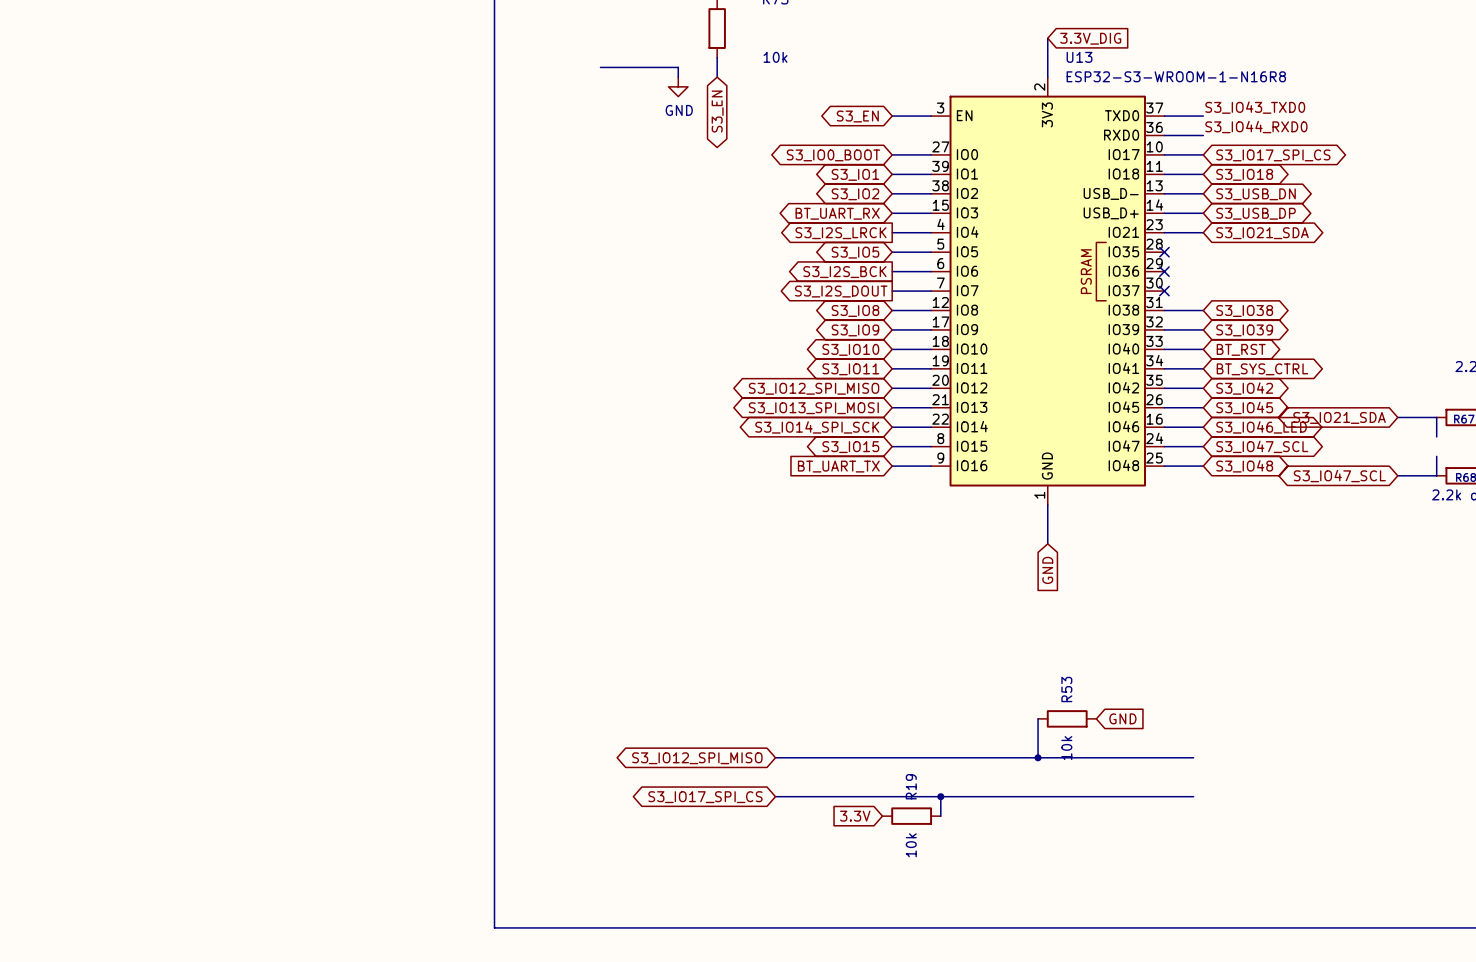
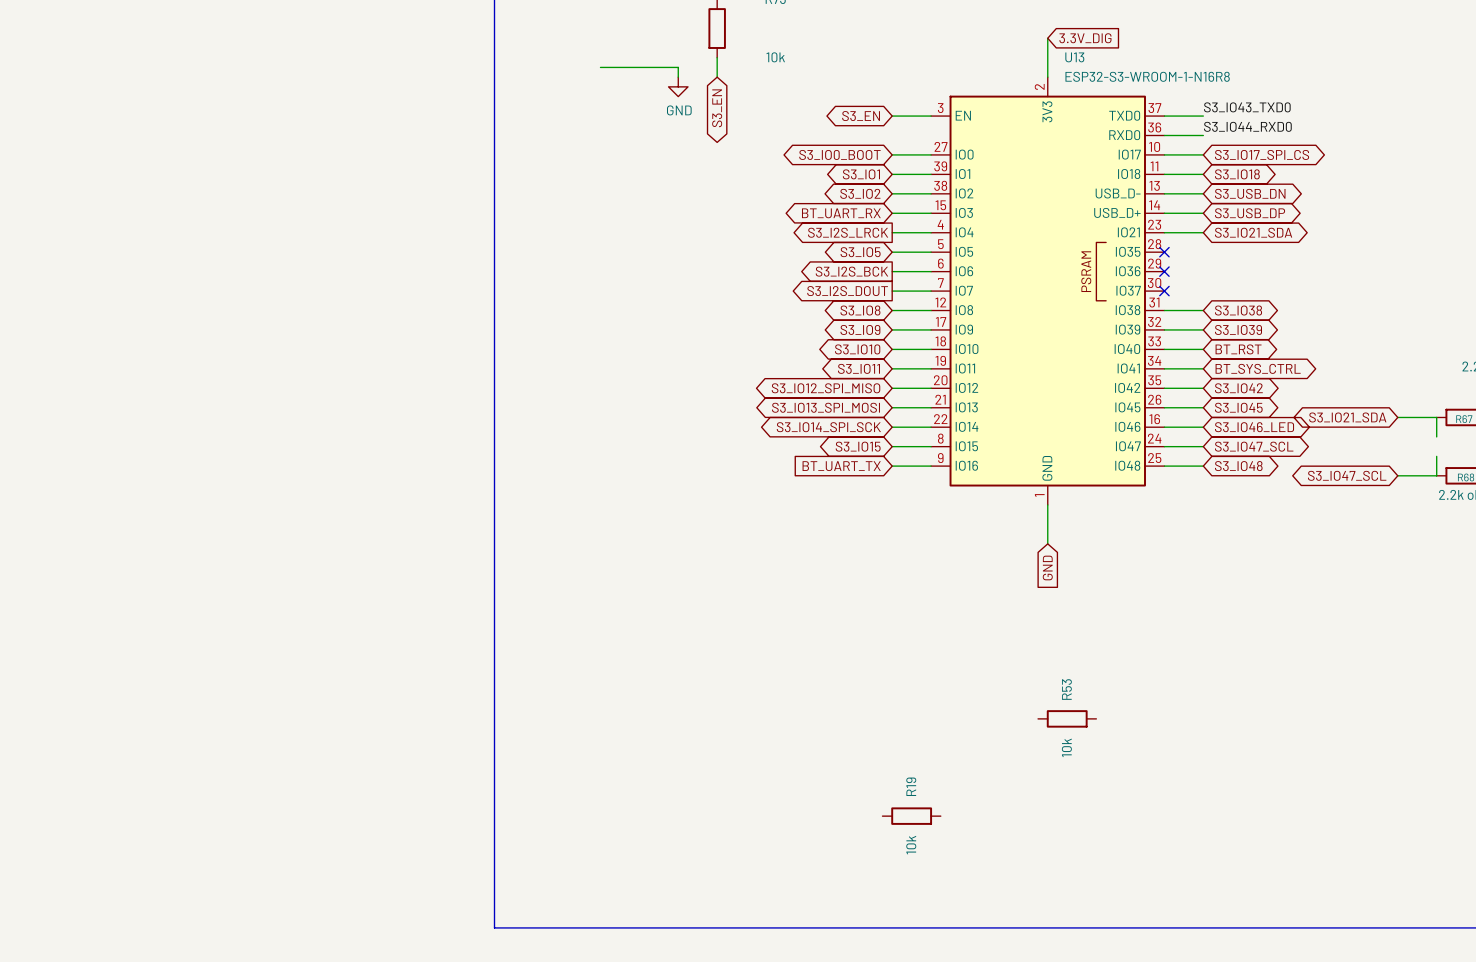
wire: (1038, 718) (1038, 757) -> none
global label: GND (1122, 718) -> none
wire: (775, 757) (1193, 757) -> none
junction: (1038, 757) -> none
global label: S3_IO12_SPI_MISO (697, 758) -> none
wire: (775, 796) (1193, 796) -> none
wire: (940, 796) (940, 816) -> none
junction: (940, 796) -> none
global label: S3_IO17_SPI_CS (705, 797) -> none
global label: 3.3V (855, 816) -> none

